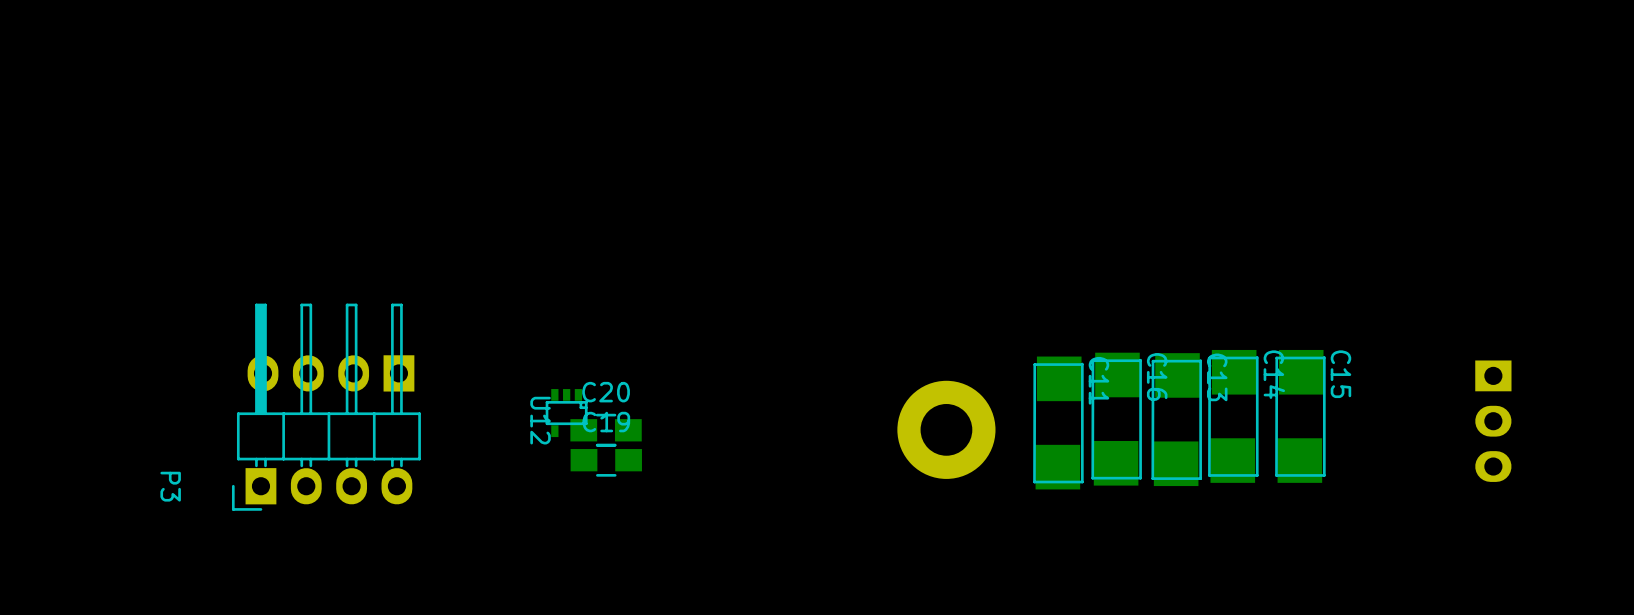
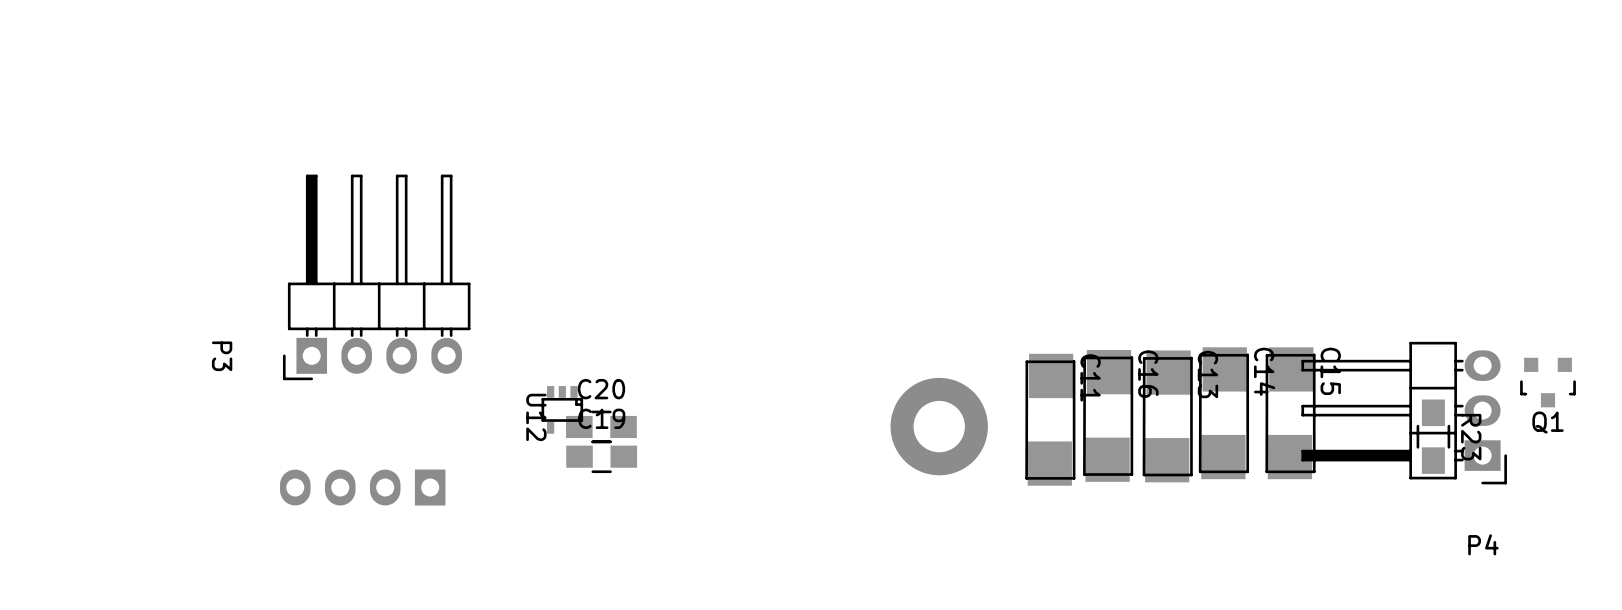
part position: (330, 373) -> (362, 487)
Q1: none -> (1548, 382)
P3 position: (326, 407) -> (376, 277)
P4 side: top (1493, 421) -> bottom (1404, 413)
R23: none -> (1433, 436)

